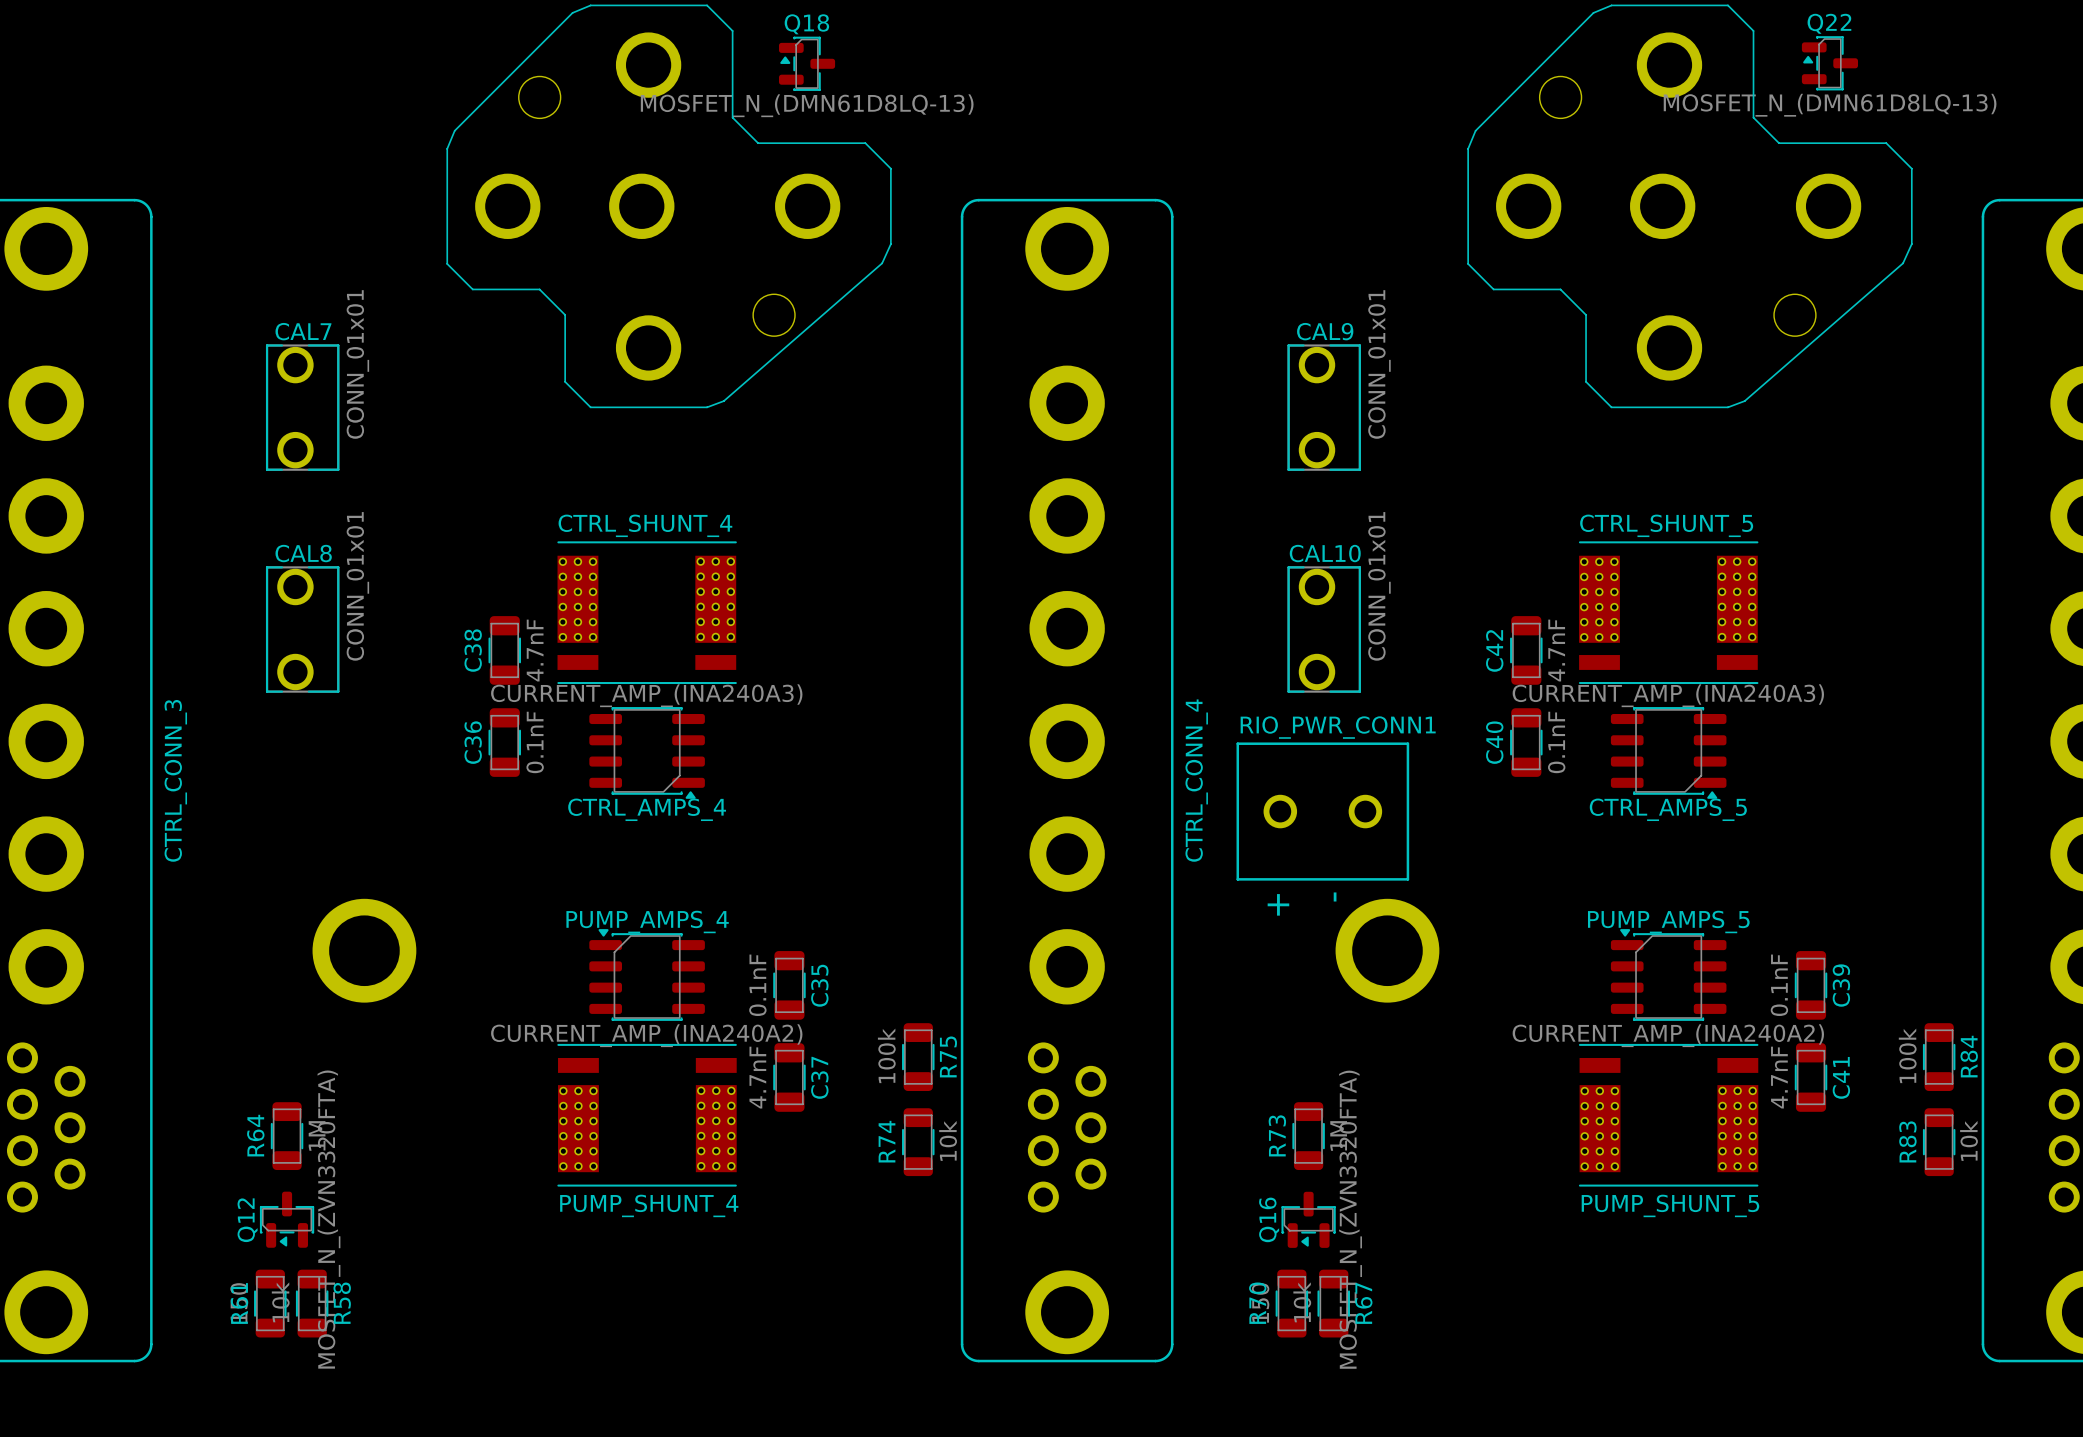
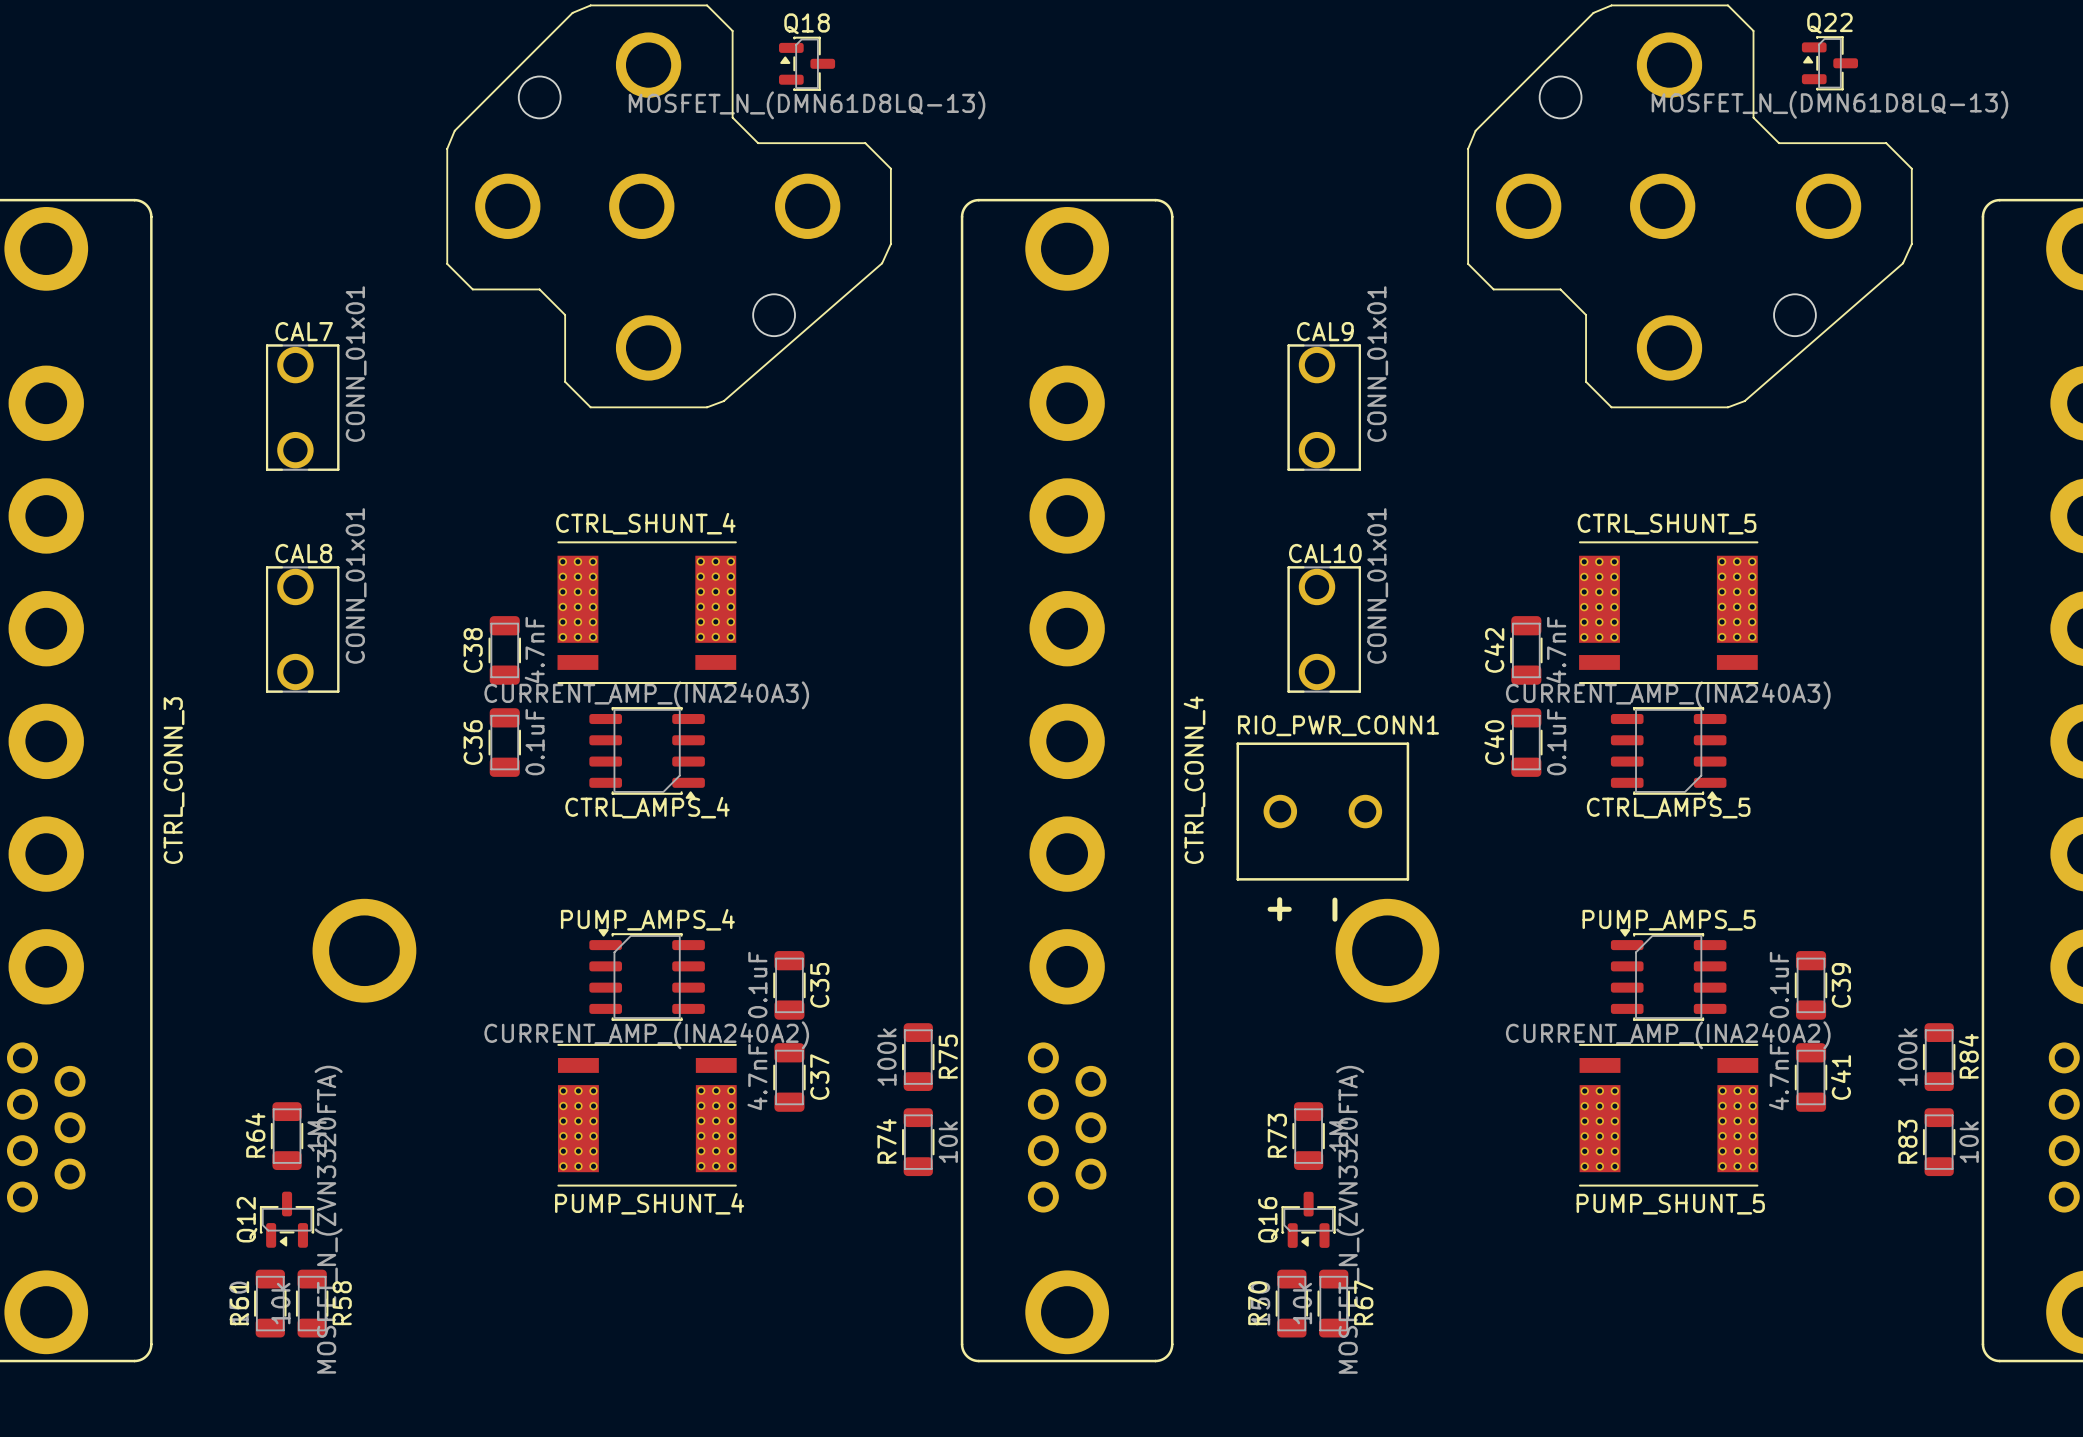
C36 value: 0.1nF (535, 742) -> 0.1uF (535, 742)
C40 value: 0.1nF (1556, 742) -> 0.1uF (1556, 742)
C35 value: 0.1nF (757, 985) -> 0.1uF (757, 984)
C39 value: 0.1nF (1779, 985) -> 0.1uF (1779, 984)

